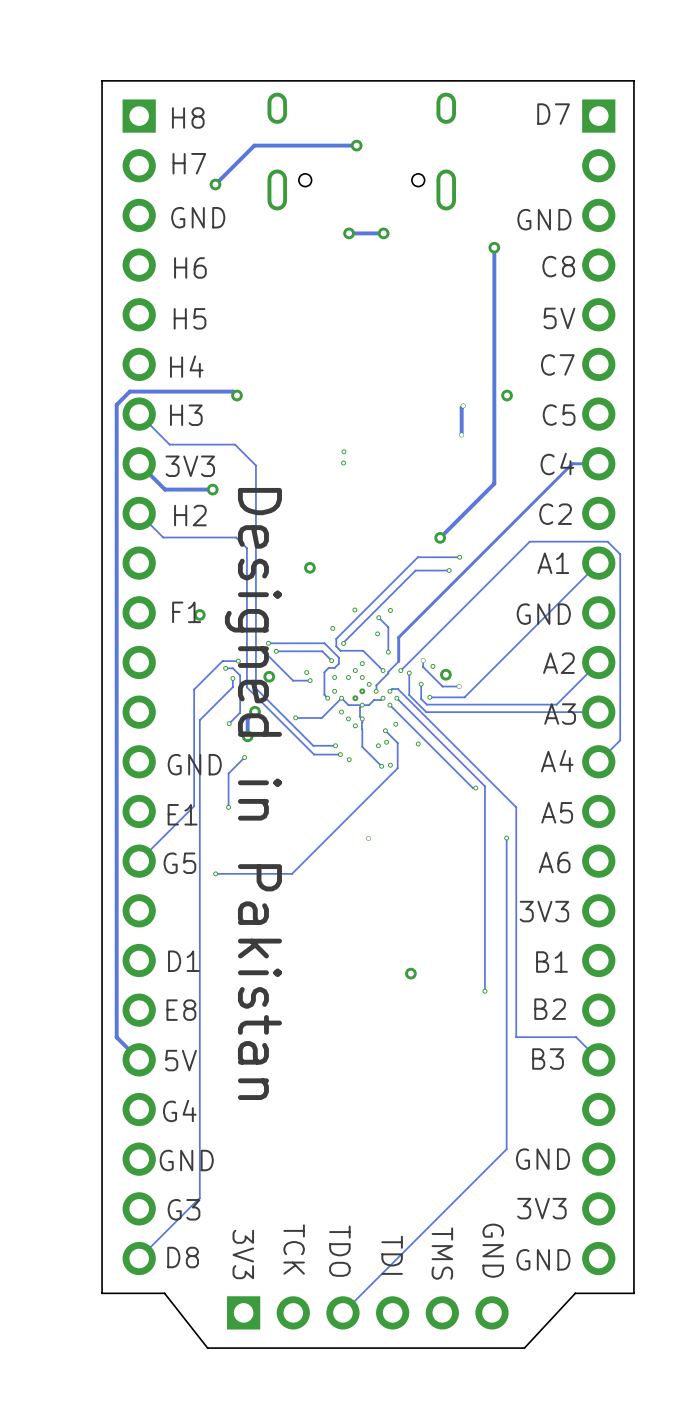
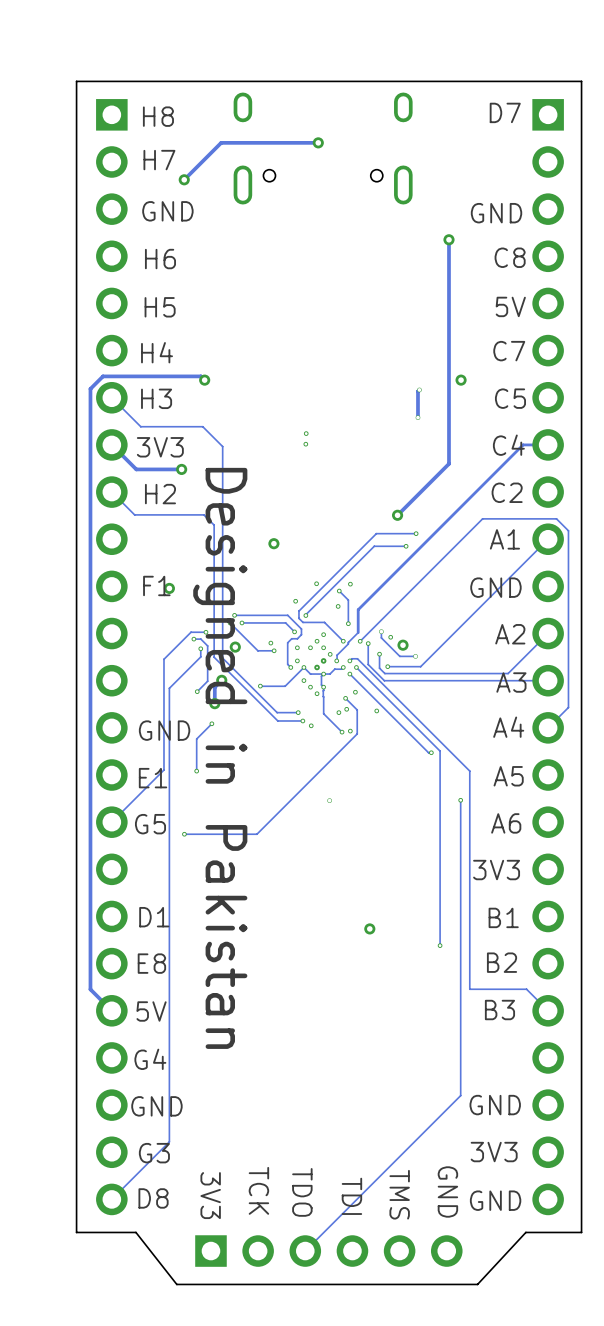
via: (349, 233) -> none
track: (383, 233) (349, 233) -> none
via: (383, 233) -> none

